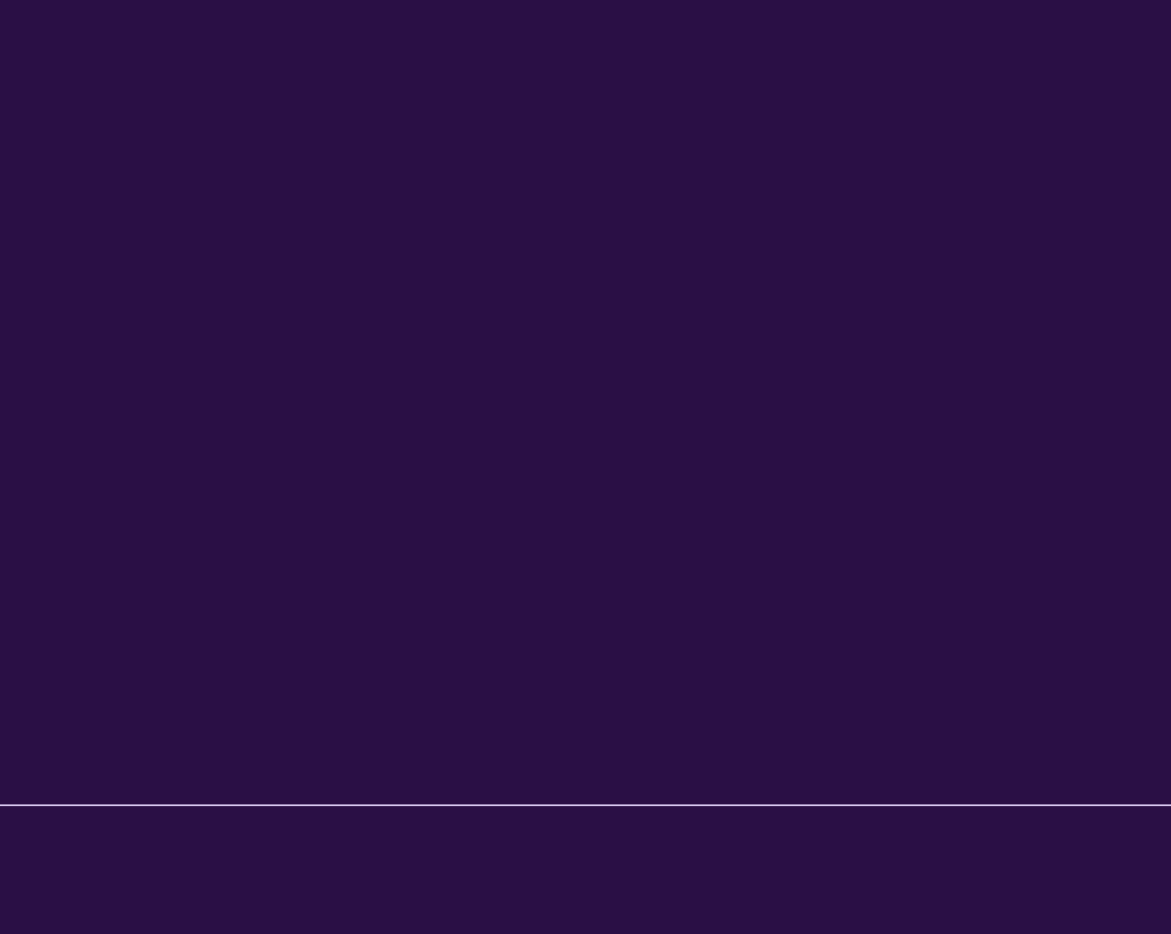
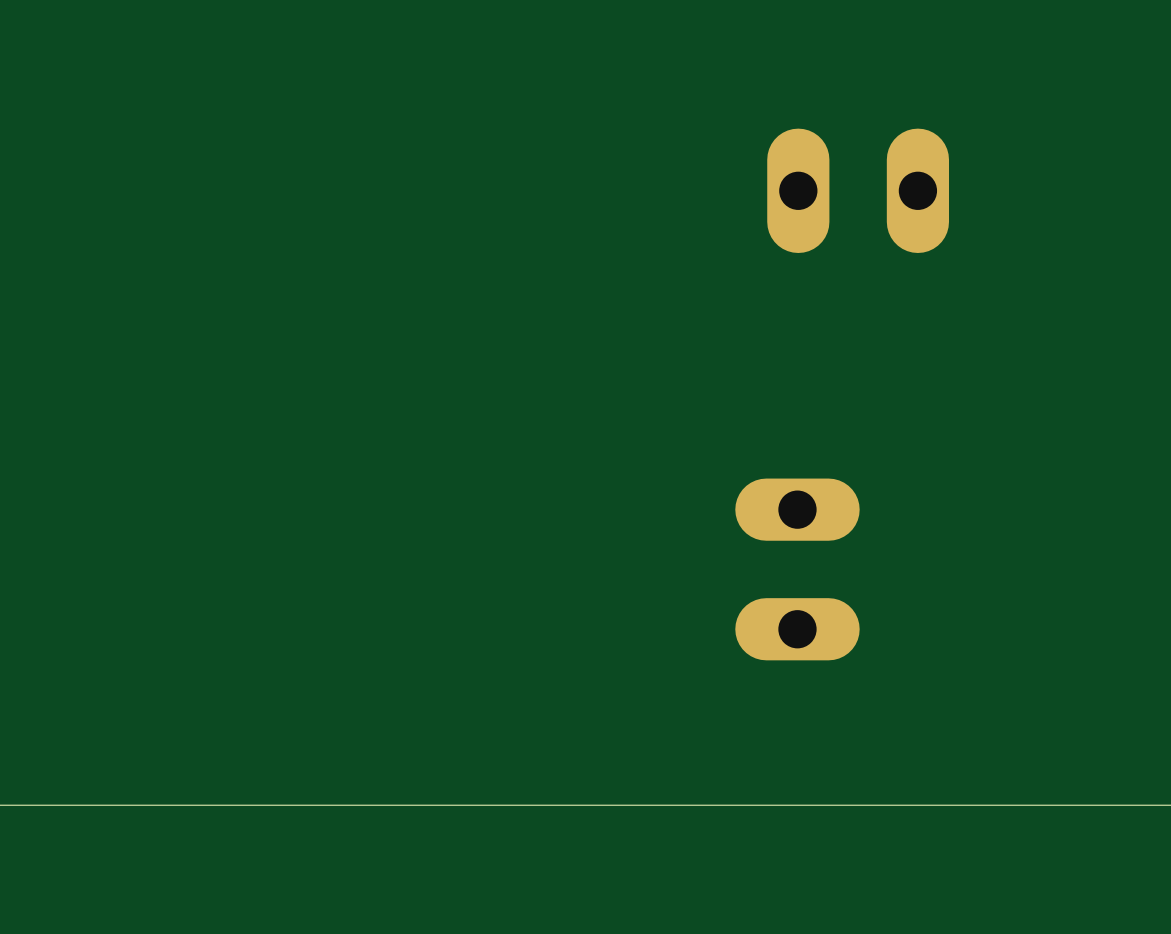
part: none -> (858, 190)
part: none -> (797, 569)

